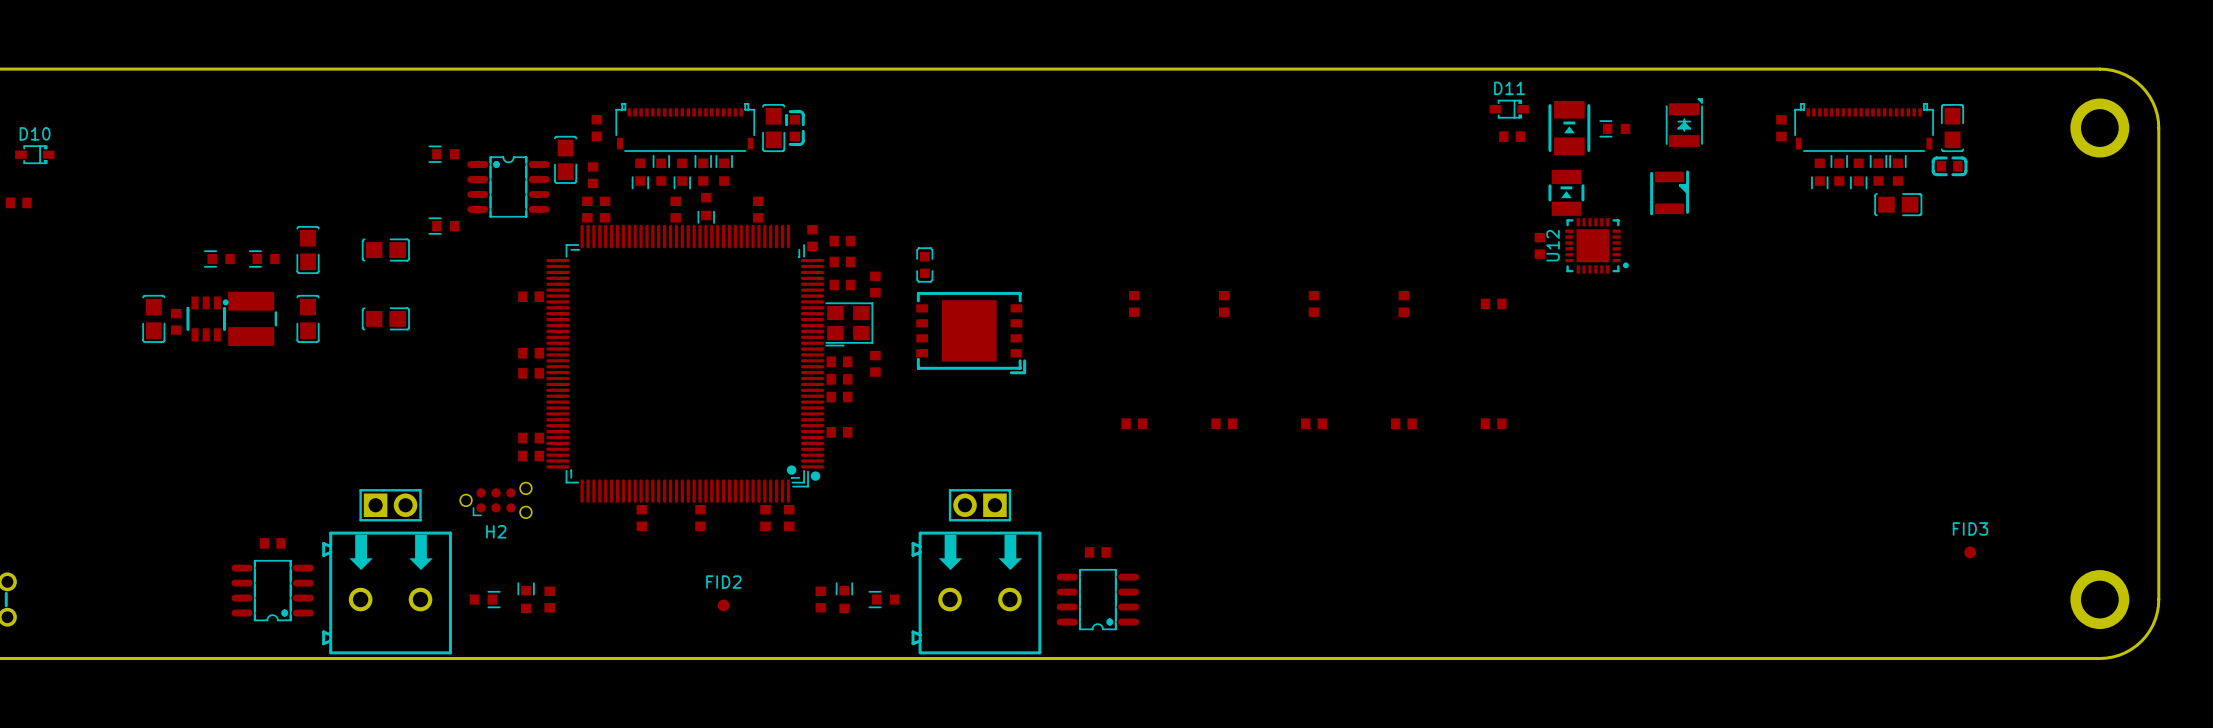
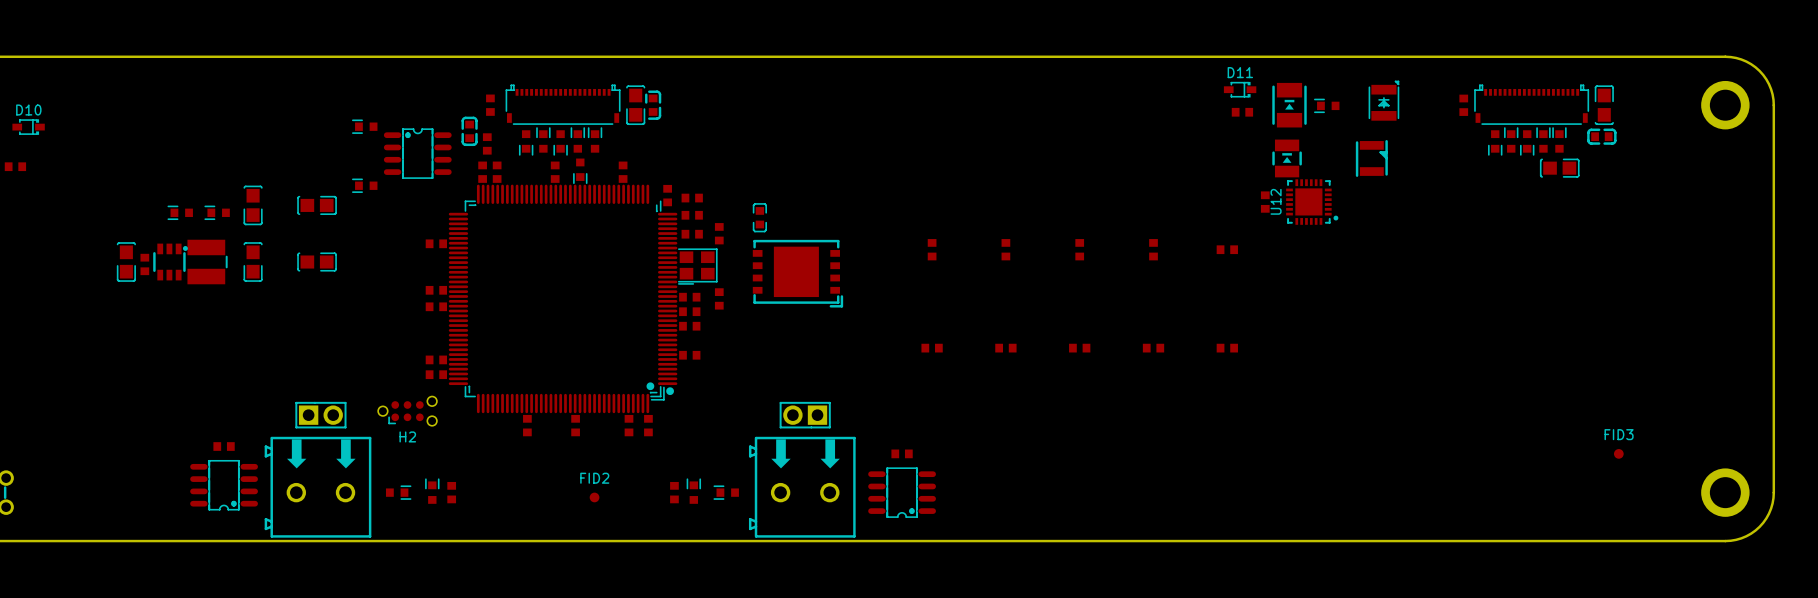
part footprint: [554, 135, 578, 184] -> [465, 120, 474, 143]
line: none -> (462, 128) (462, 120) (465, 117) (475, 118) (476, 128)
line: none -> (462, 134) (462, 142) (465, 144) (475, 143) (476, 134)

